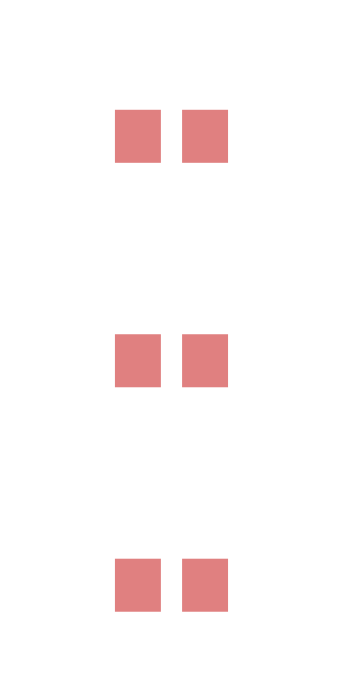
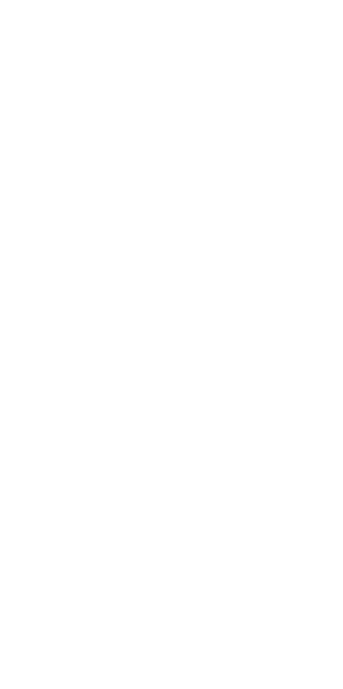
part: (171, 136) -> none
part: (171, 360) -> none
part: (171, 585) -> none

